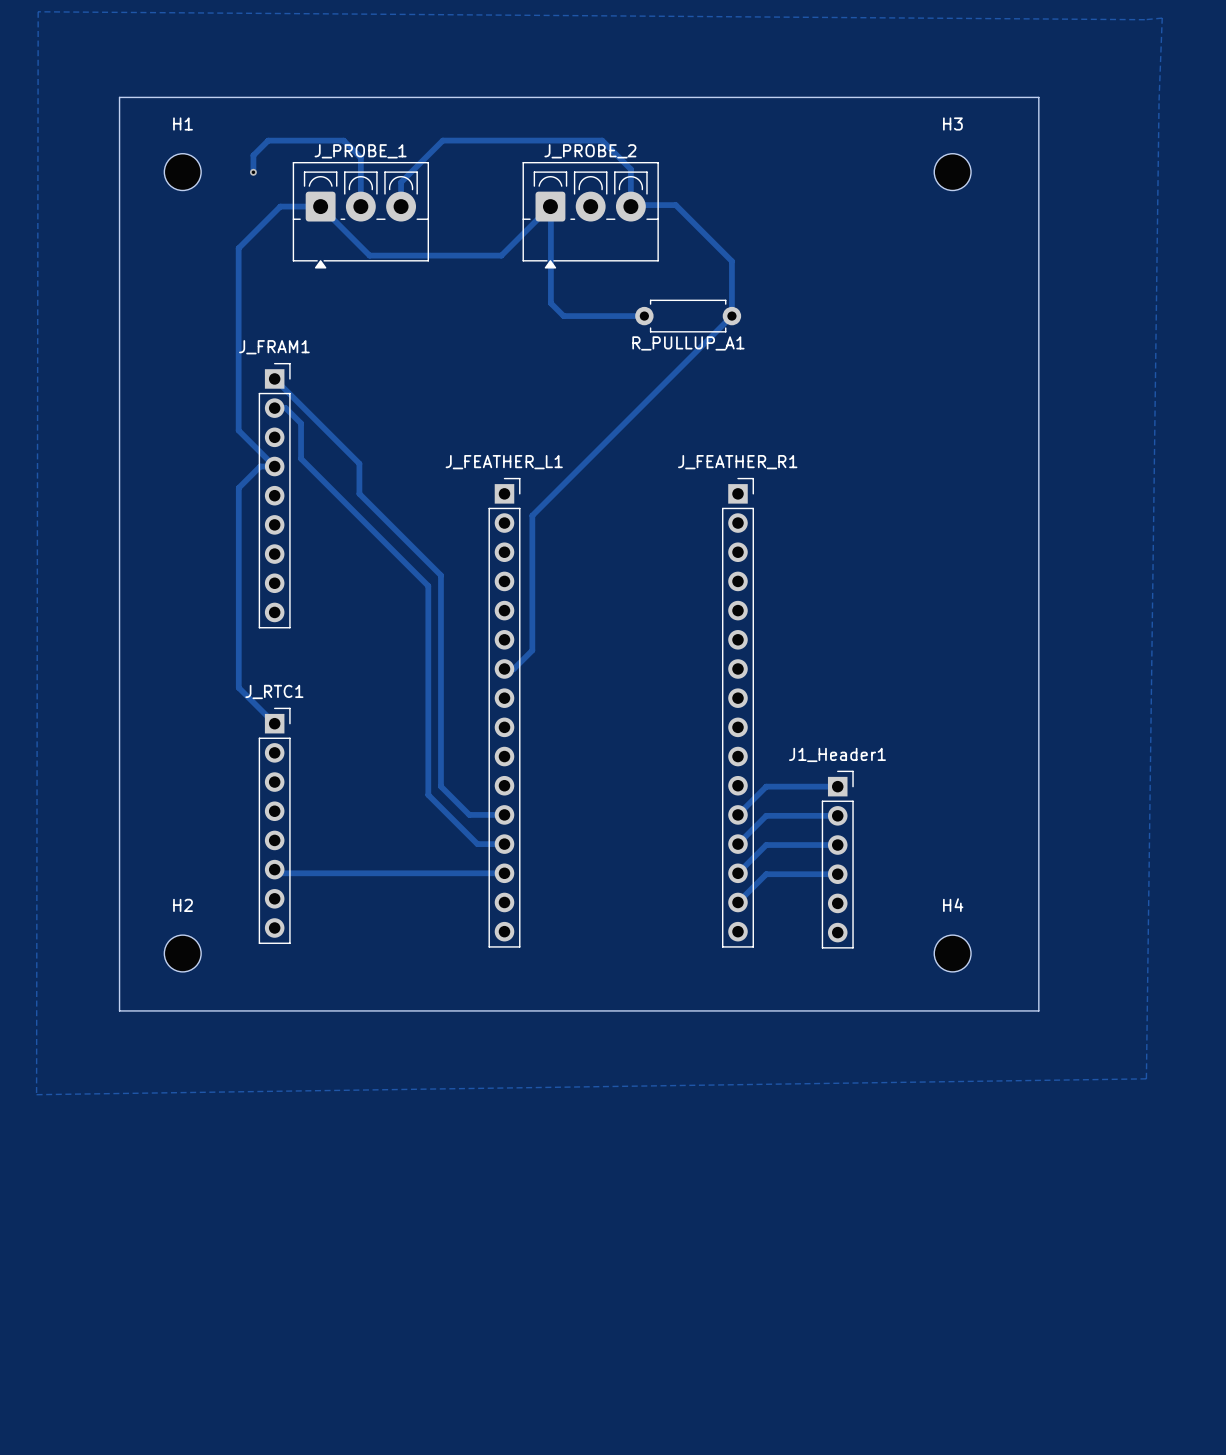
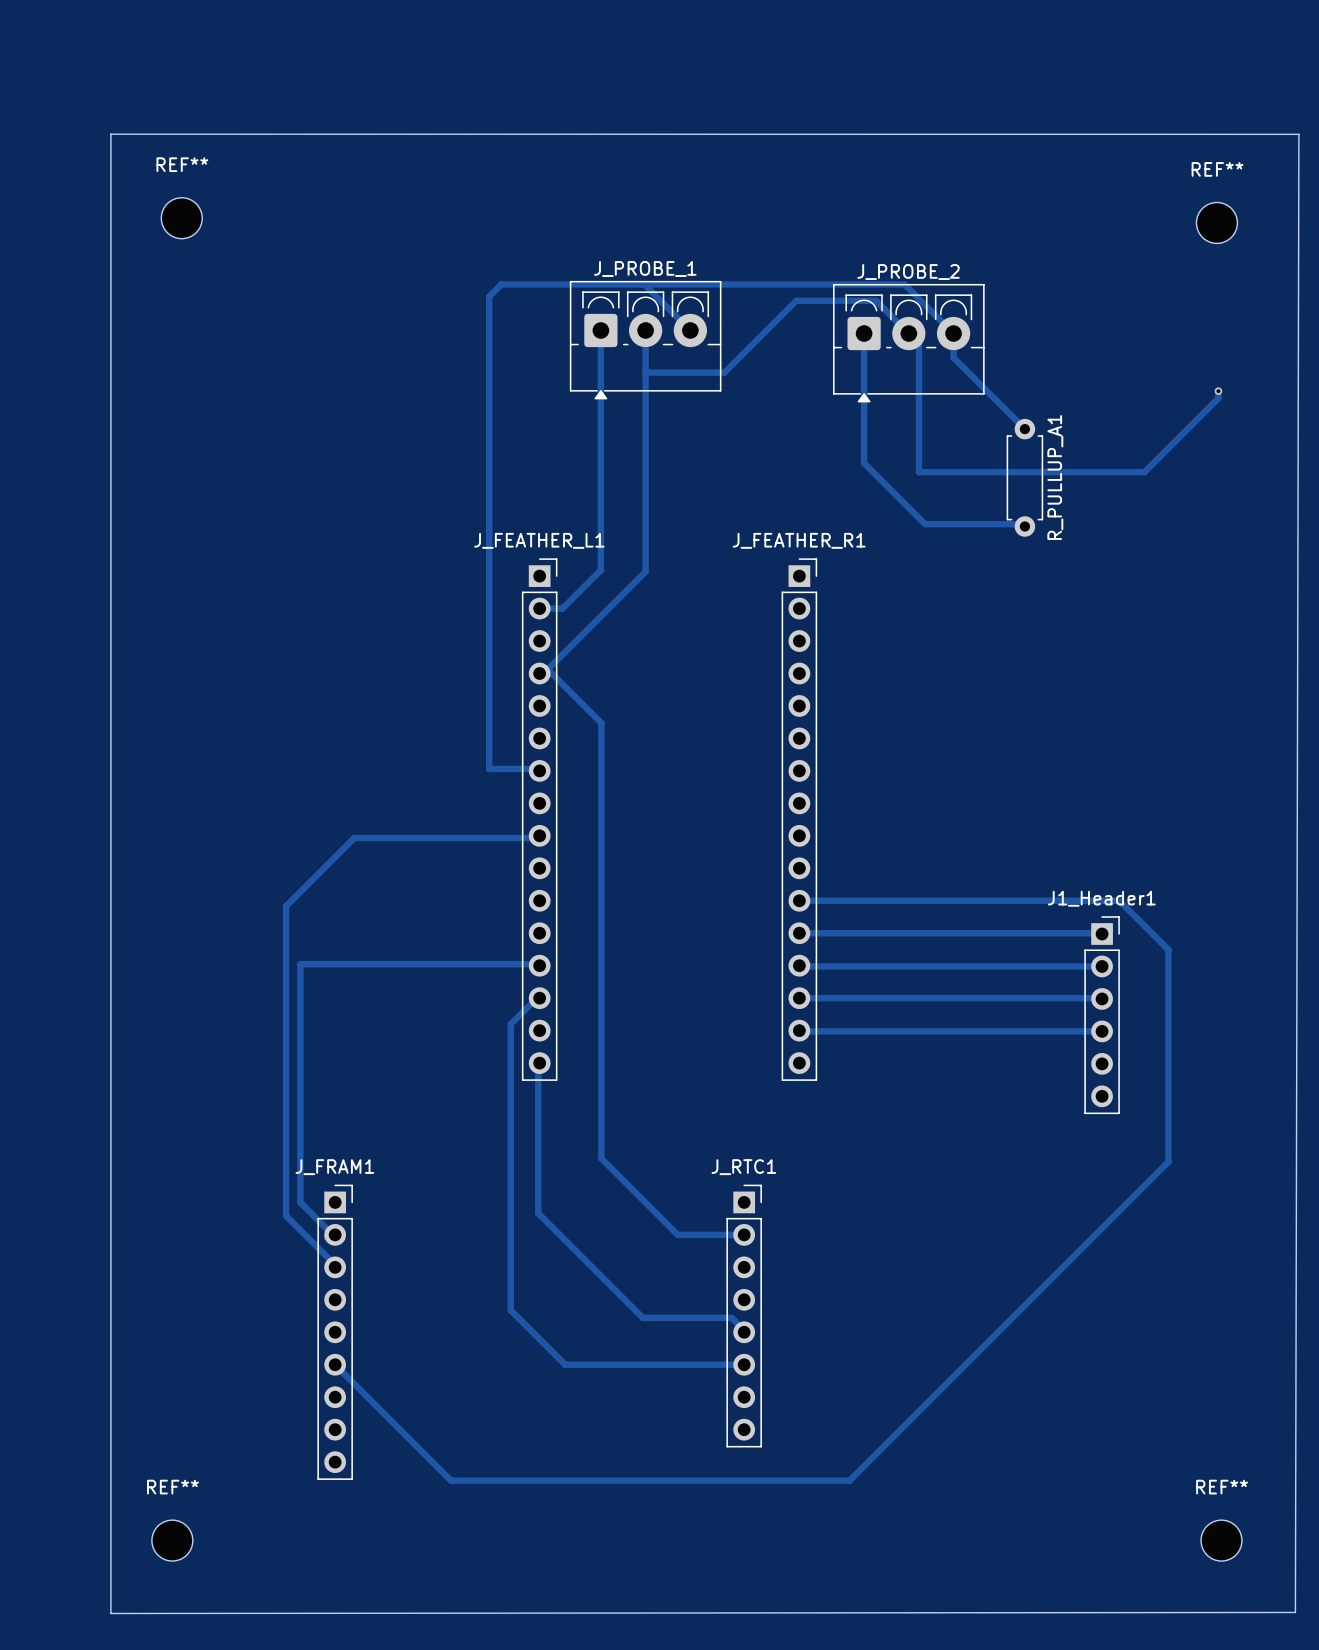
zone outline: (38, 11) (1144, 19) (1162, 18) (1159, 100) (1146, 1078) (36, 1094) (38, 11) -> none
board edge: (119, 97) (1038, 97) (1038, 1010) (119, 1010) (119, 97) -> (110, 134) (110, 1613) (1295, 1612) (1298, 134) (110, 134)
H1 name: H1 (183, 123) -> REF** (182, 164)
track: (253, 172) (253, 155) (268, 140) (343, 140) (360, 157) (360, 206) -> none
via: (253, 172) -> none
H3: (952, 172) -> none
REF**: none -> (1216, 222)
track: (401, 206) (401, 182) (442, 140) (602, 140) (630, 169) (630, 206) (675, 205) (731, 261) (731, 316) (532, 515) (532, 650) (513, 668) (504, 668) -> none
J_PROBE_1 position: (360, 215) -> (645, 340)
J_PROBE_2 position: (590, 215) -> (908, 343)
track: none -> (644, 284) (690, 330)
track: none -> (600, 330) (600, 570)
track: none -> (645, 330) (645, 571) (545, 671) (538, 671)
track: none -> (864, 333) (864, 463) (925, 524) (1022, 524) (1026, 528)
track: none -> (645, 372) (724, 372) (796, 300) (876, 300) (918, 343) (918, 472) (1144, 472) (1218, 398) (1218, 391)
track: (644, 316) (563, 316) (550, 303) (550, 206) (501, 255) (369, 255) (320, 206) (280, 206) (238, 248) (238, 430) (274, 466) (260, 466) (238, 487) (238, 687) (274, 723) -> none
R_PULLUP_A1 rotation: 0° (688, 316) -> 90° clockwise (1024, 477)
R_PULLUP_A1 position: (688, 316) -> (1024, 477)
via: none -> (1218, 391)
R_PULLUP_A1 name position: R_PULLUP_A1 (688, 343) -> R_PULLUP_A1 (1055, 477)
track: none -> (1024, 429) (953, 357) (953, 333) (904, 284) (501, 284) (489, 296) (489, 768) (538, 769)
track: (274, 378) (359, 463) (359, 493) (440, 575) (440, 786) (469, 814) (504, 814) -> none
track: (274, 408) (285, 408) (301, 423) (301, 458) (428, 585) (428, 794) (477, 844) (504, 844) -> none
track: none -> (600, 570) (562, 608) (539, 608)
J_FRAM1 position: (274, 495) -> (335, 1332)
track: none -> (539, 673) (551, 673) (601, 723) (601, 1158) (677, 1234) (744, 1234)
track: none -> (538, 834) (534, 838) (354, 838) (286, 906) (286, 1215) (335, 1265) (335, 1270)
track: none -> (799, 900) (1119, 900) (1168, 949) (1168, 1161) (849, 1480) (451, 1480) (335, 1364)
track: (837, 786) (766, 786) (737, 814) -> (1102, 934) (799, 933)
track: (837, 815) (766, 815) (737, 844) -> none
J_RTC1 position: (274, 825) -> (744, 1316)
track: none -> (538, 964) (300, 964) (300, 1202) (335, 1237) (327, 1237)
track: none -> (800, 966) (1102, 966)
track: (837, 845) (766, 845) (737, 873) -> (1102, 998) (799, 998)
J1_Header1 position: (837, 859) -> (1102, 1015)
track: (274, 869) (278, 873) (504, 873) -> none
track: none -> (538, 996) (510, 1024) (510, 1310) (565, 1364) (744, 1364)
track: (837, 874) (766, 874) (737, 902) -> none
track: none -> (800, 1031) (1102, 1031)
track: none -> (538, 1061) (538, 1213) (642, 1317) (731, 1317) (744, 1332)
H2: (182, 953) -> none
H4: (952, 953) -> none
REF**: none -> (172, 1540)
REF**: none -> (1221, 1540)

